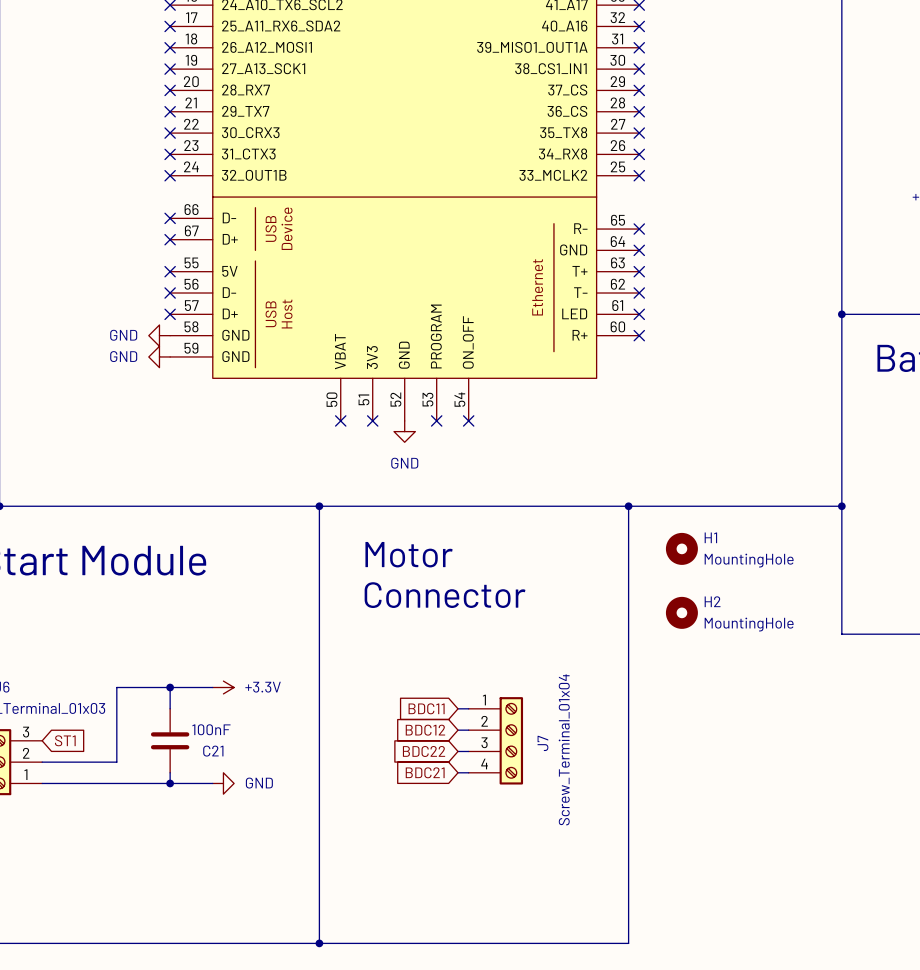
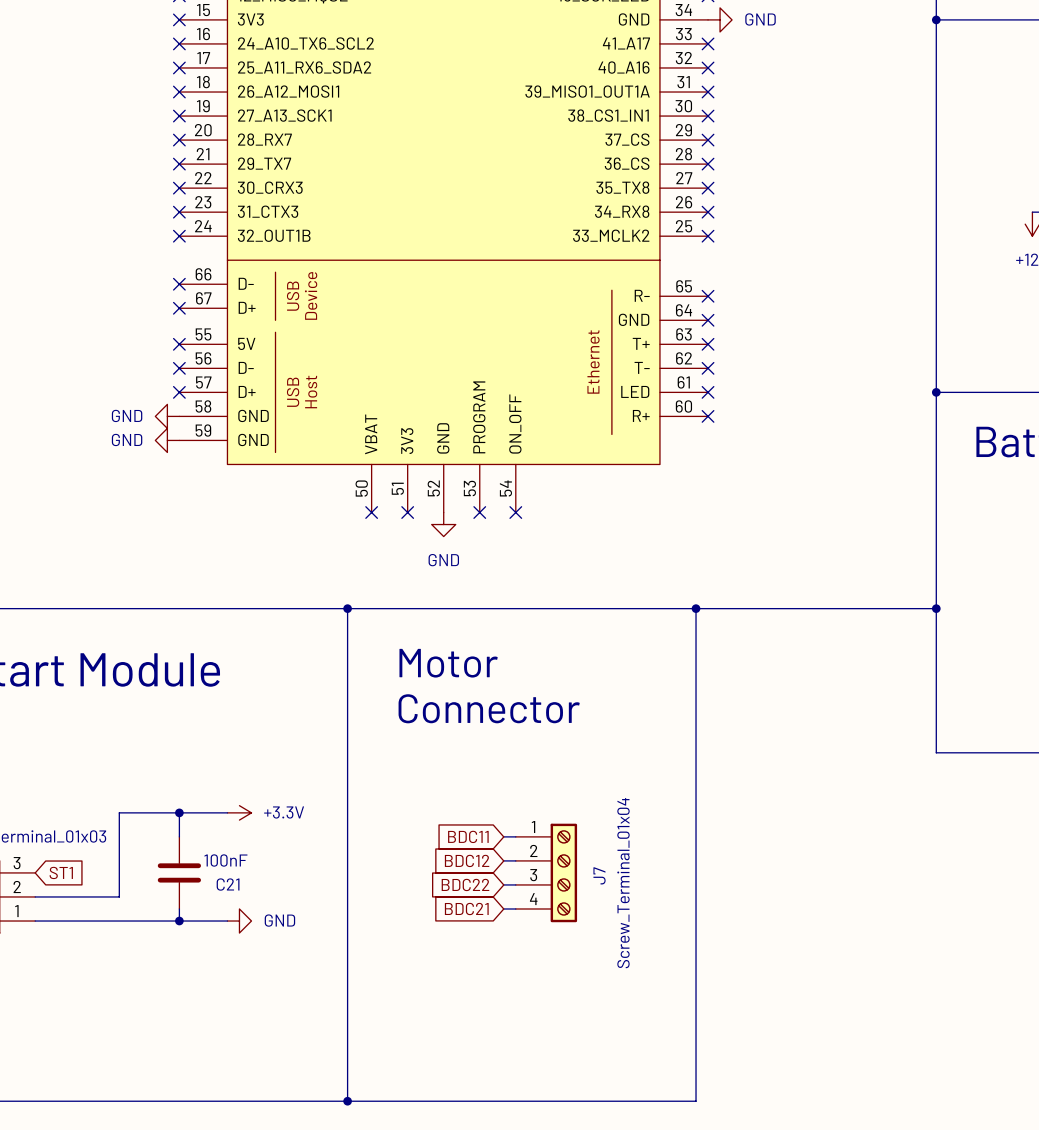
H1: MountingHole (681, 548) -> none
H2: MountingHole (681, 612) -> none

